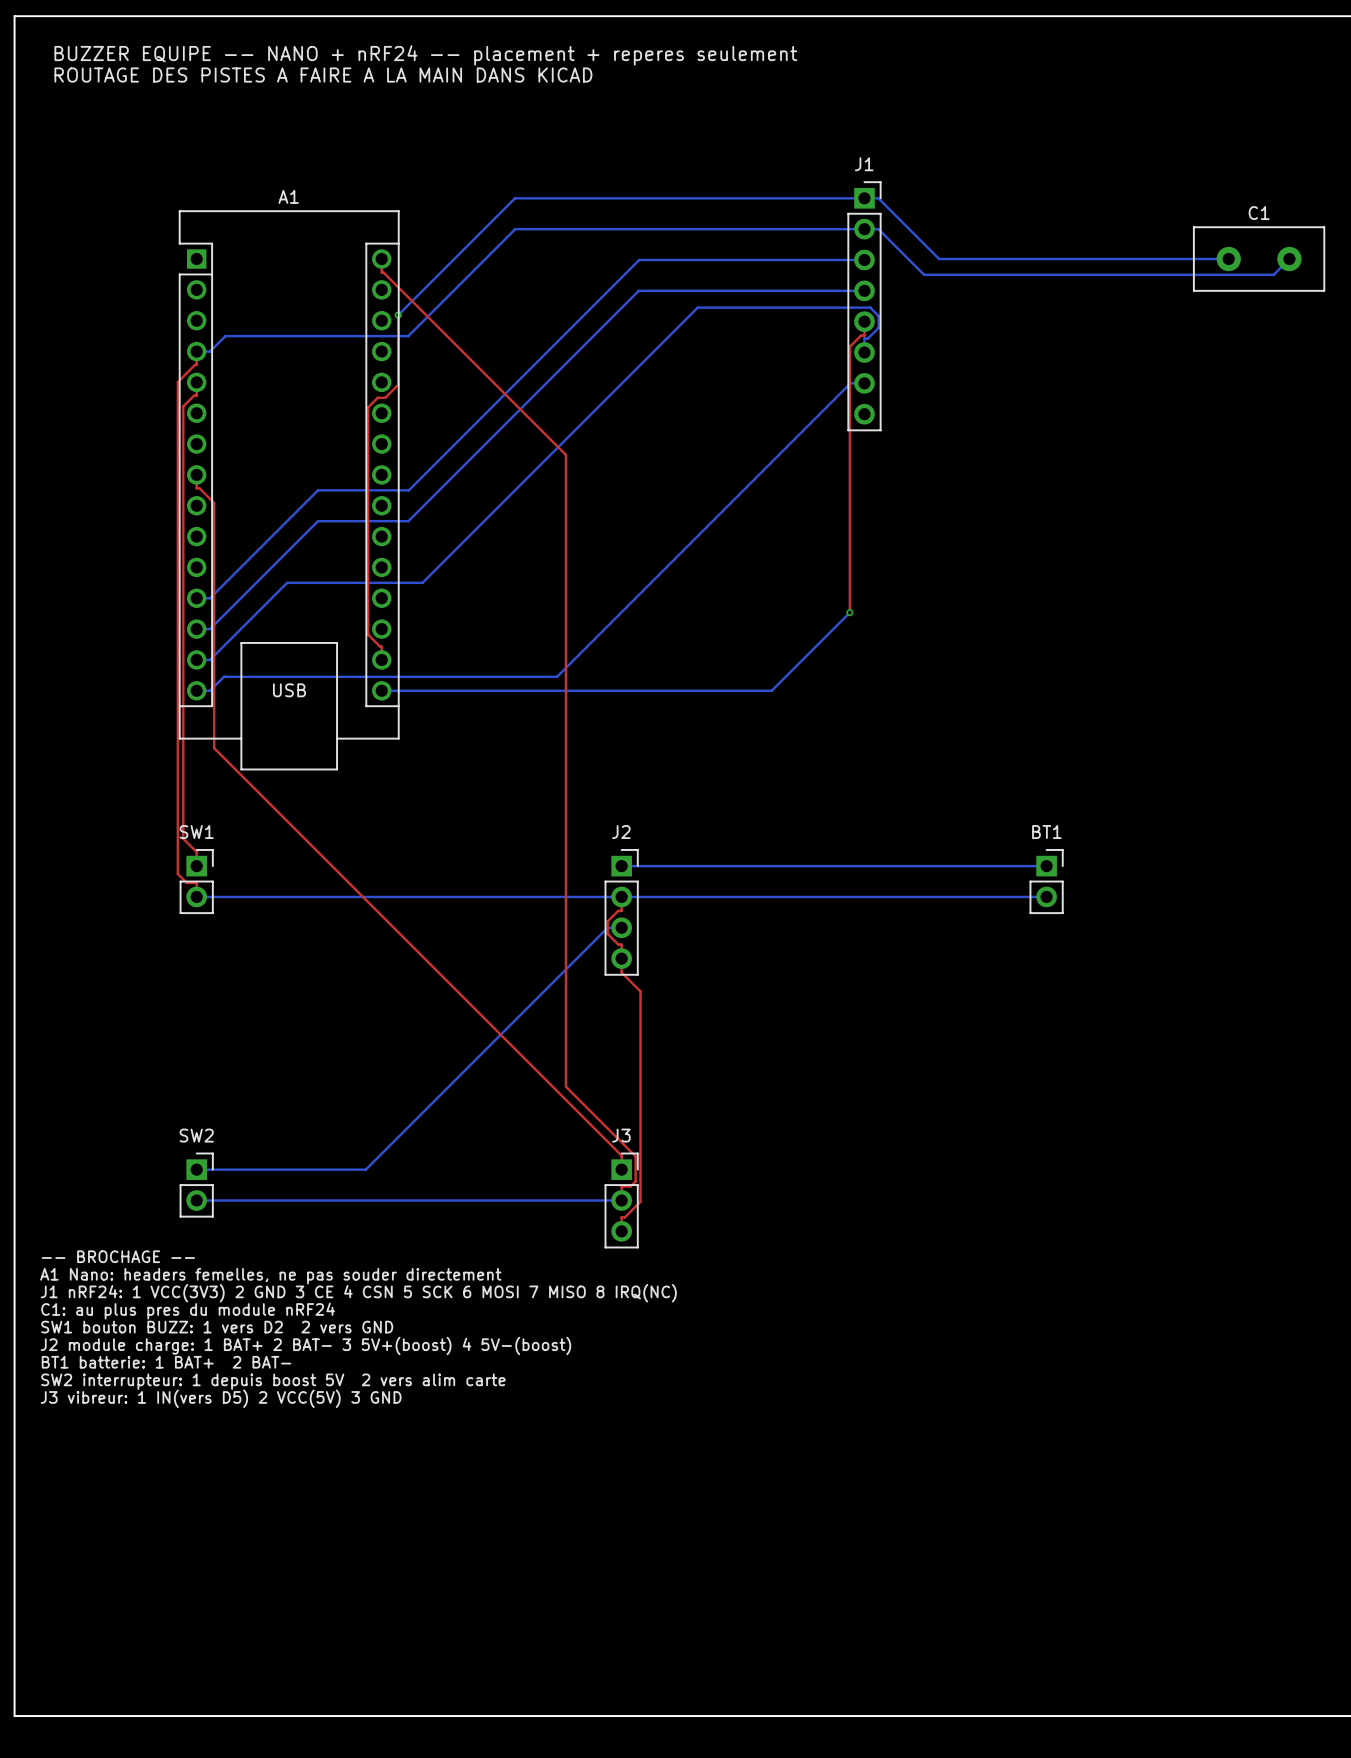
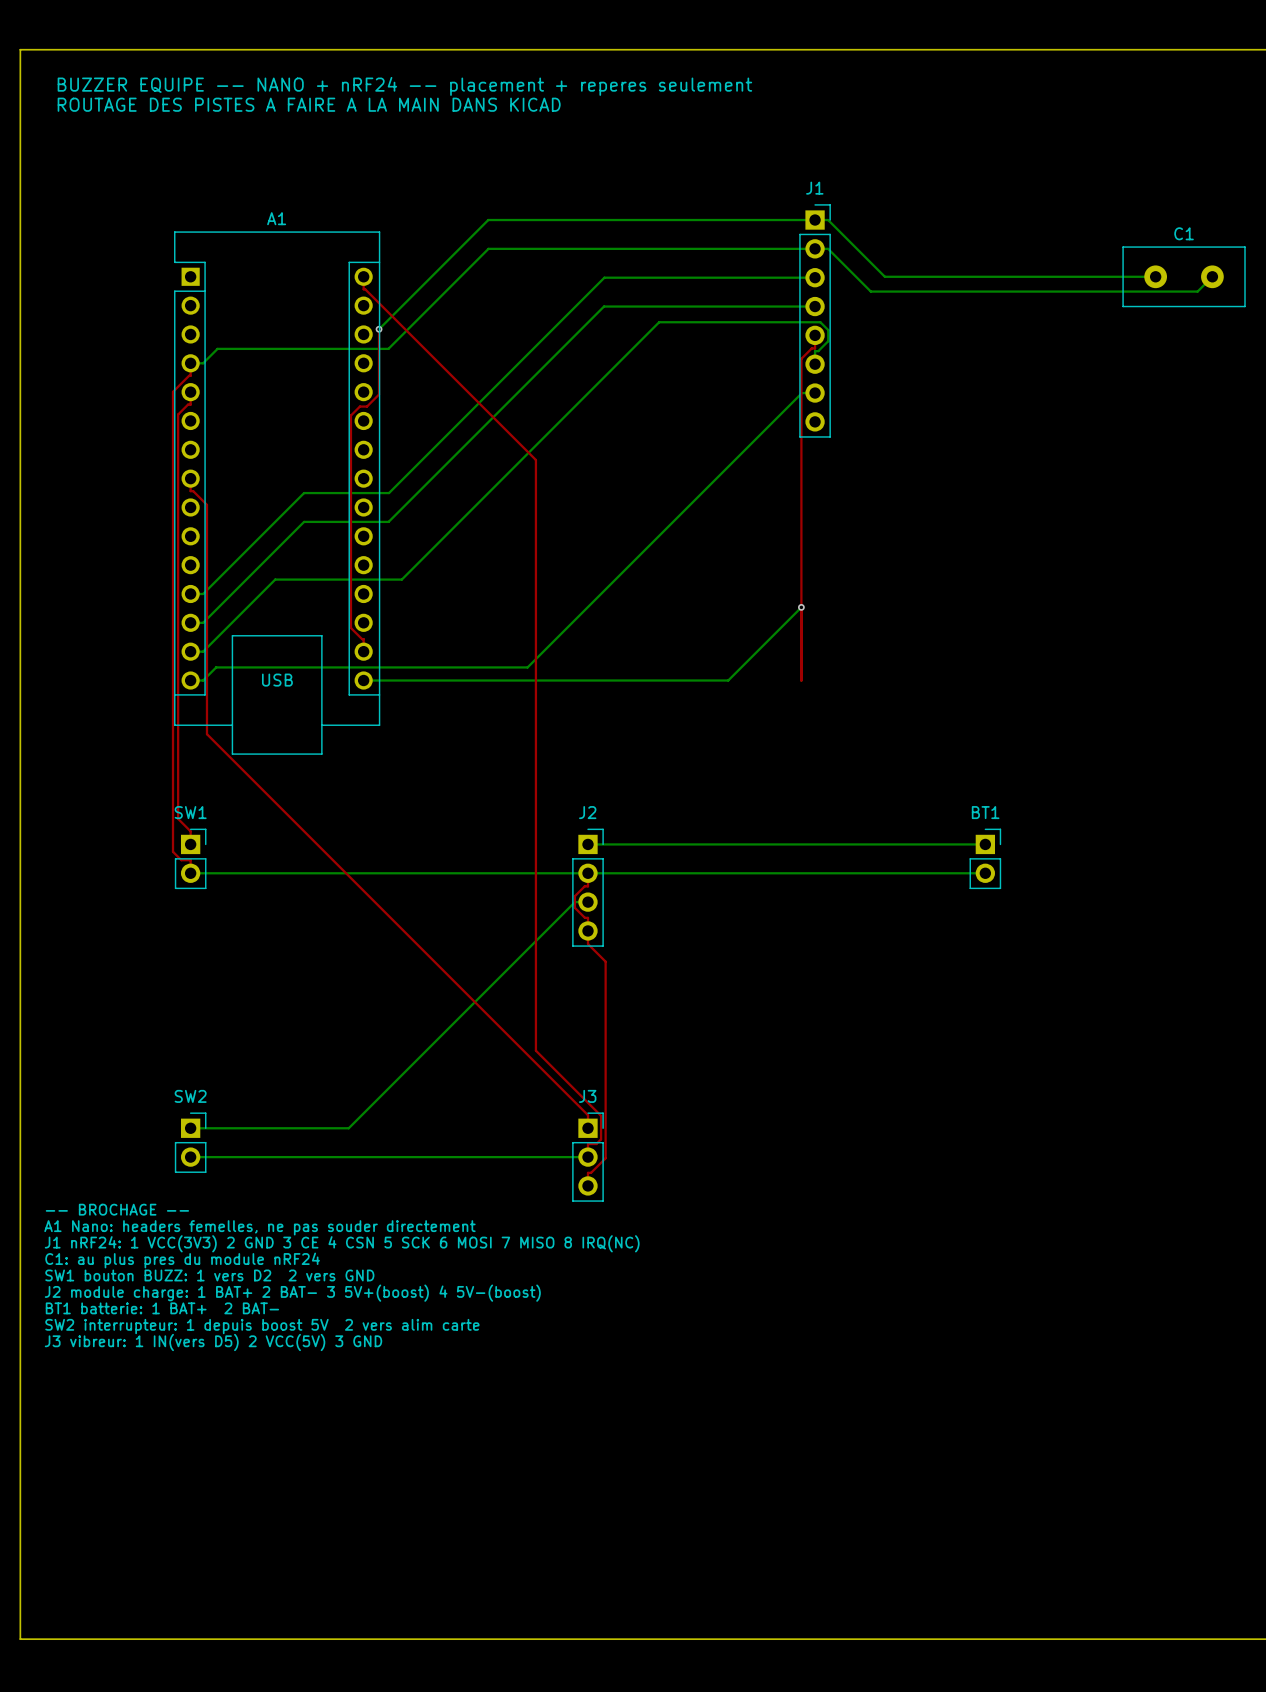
top track: none -> (801, 607) (801, 680)

